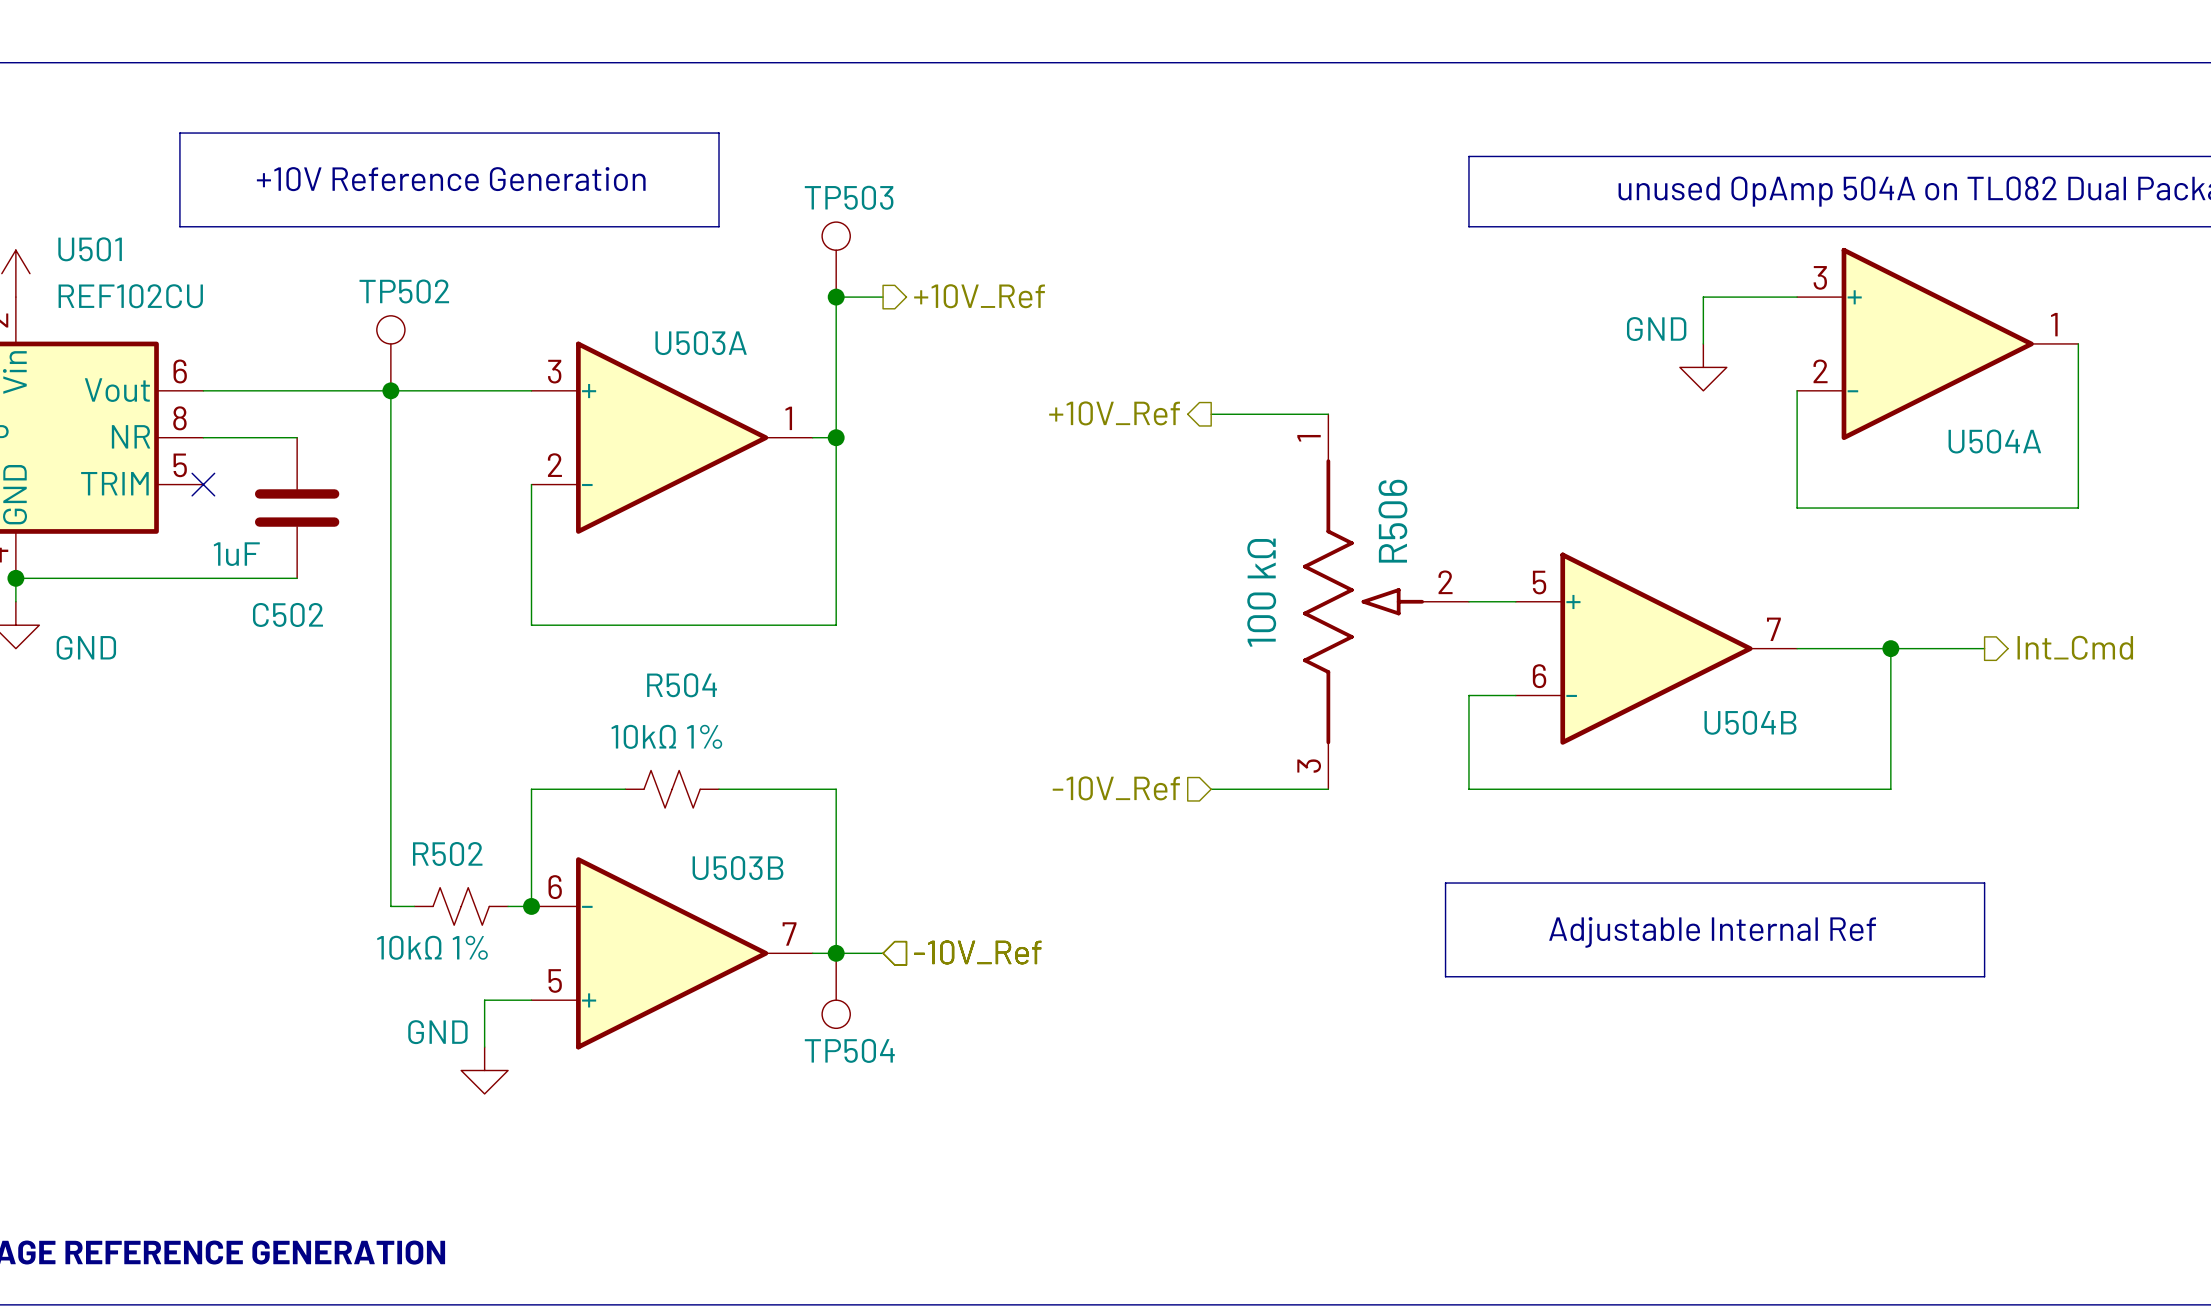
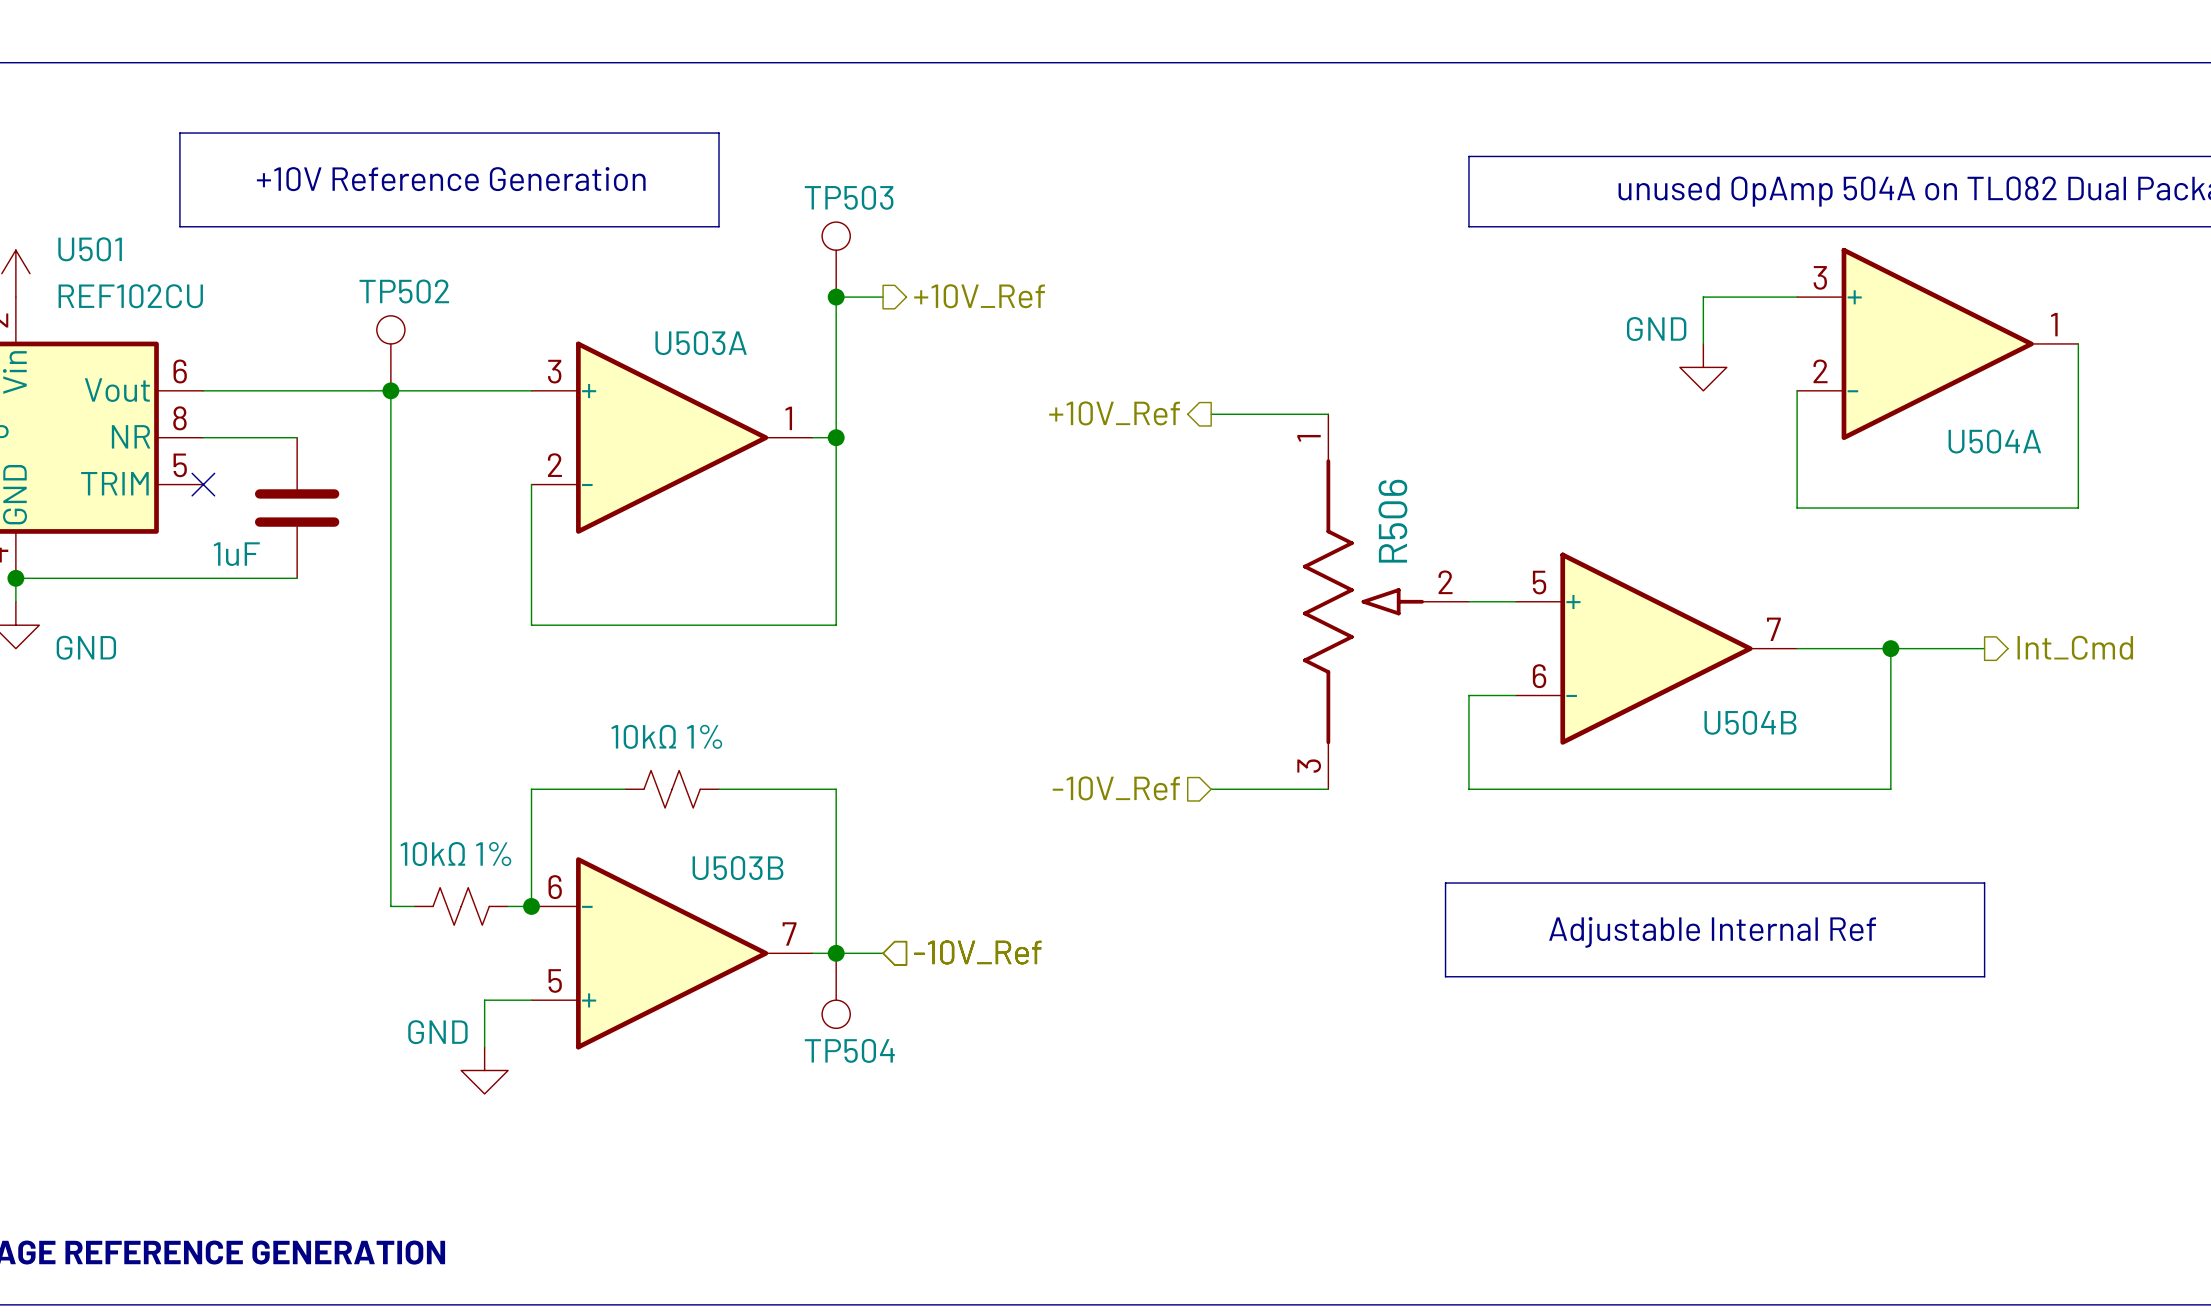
R506 value: 100 kΩ (1261, 592) -> none
C502 name: C502 (287, 614) -> none
R504 name: R504 (682, 685) -> none
R502 name: R502 (447, 854) -> none
R502 value position: 10kΩ 1% (432, 947) -> 10kΩ 1% (455, 854)

